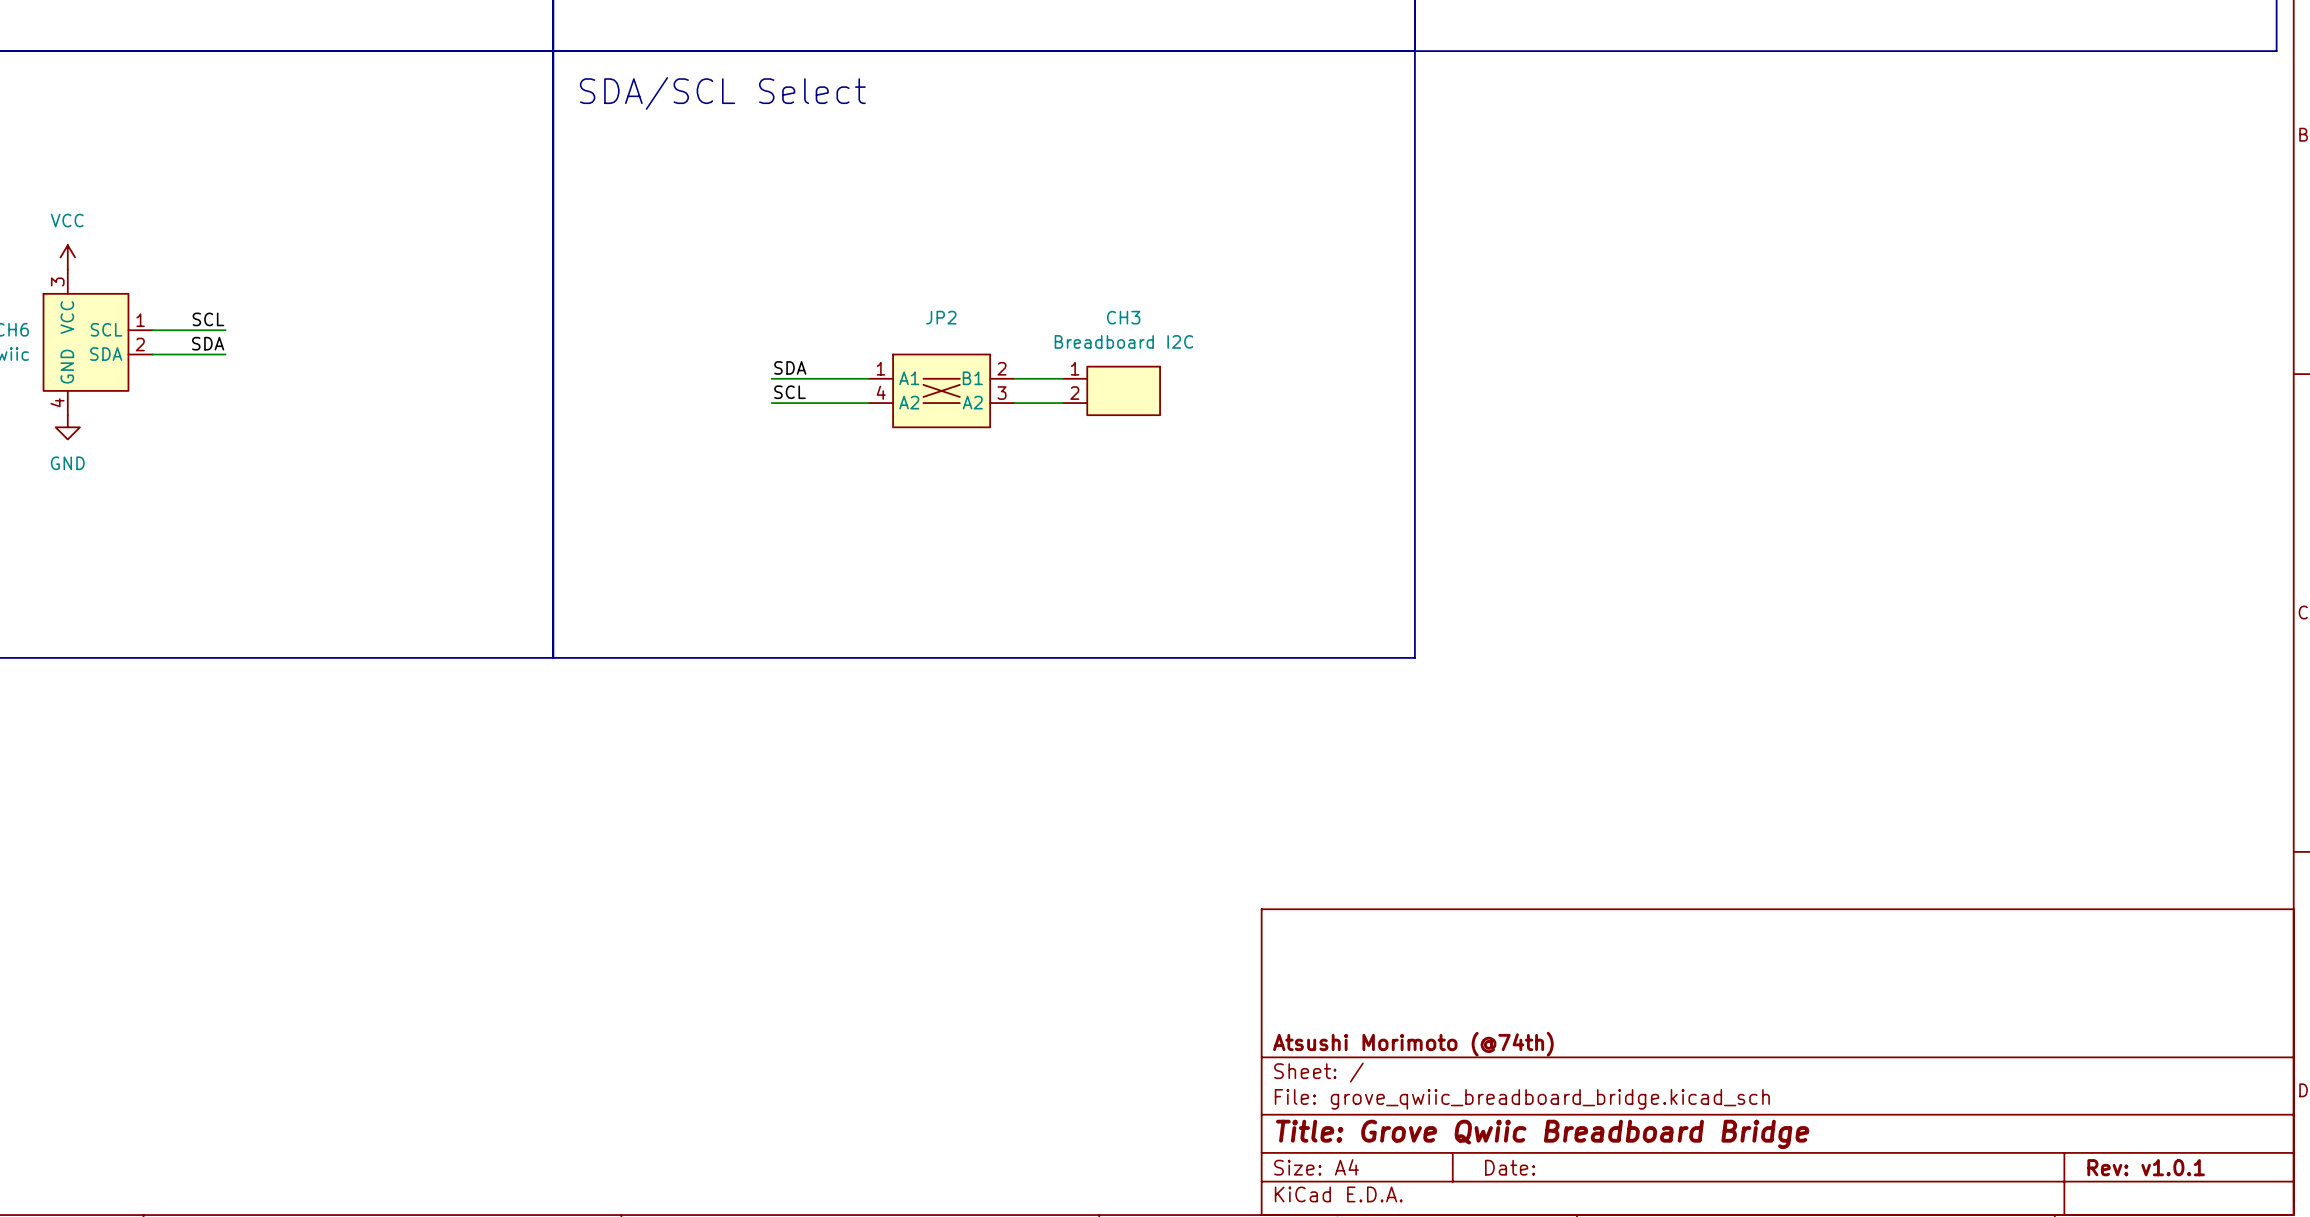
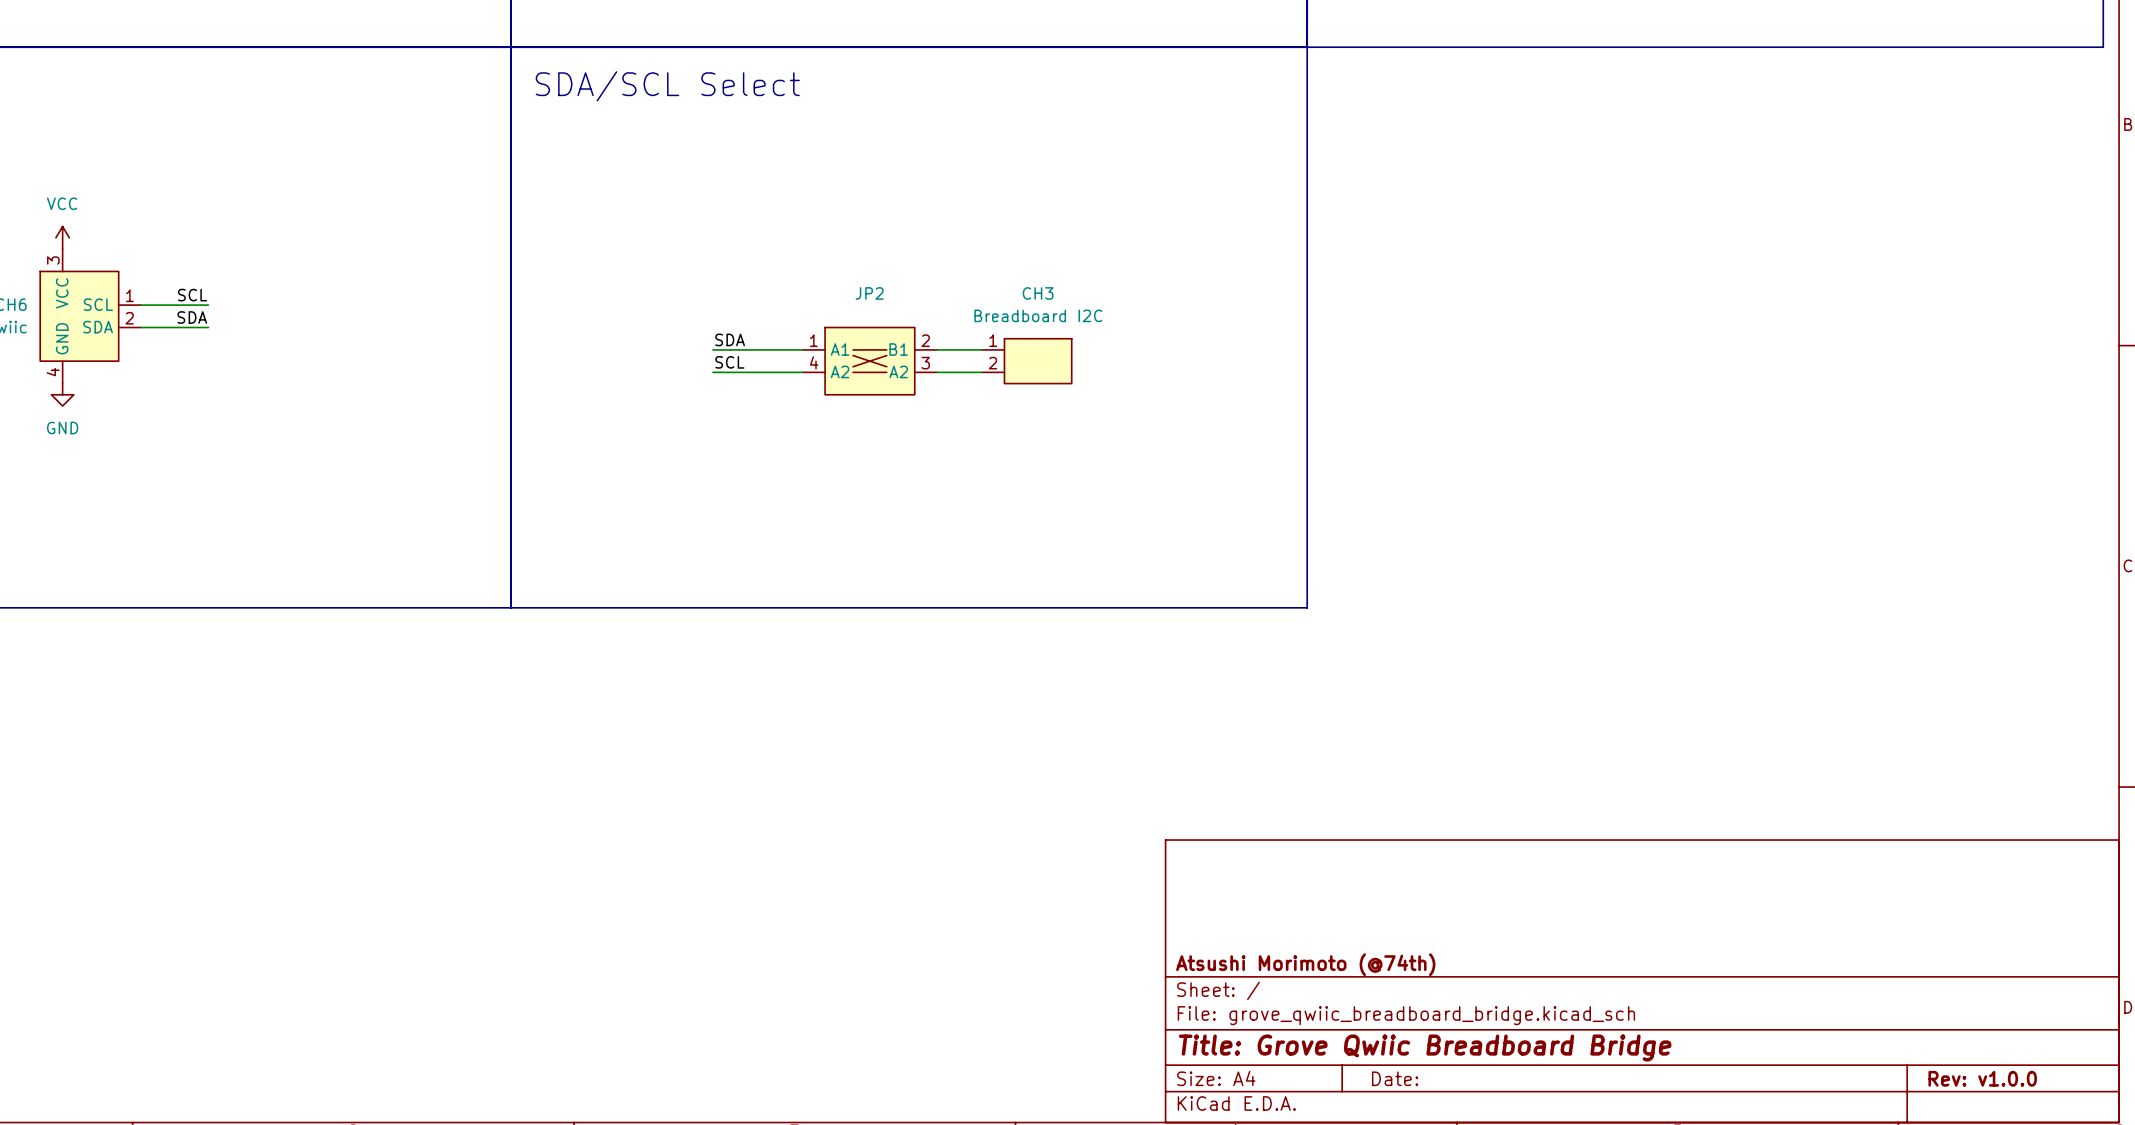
title block: Rev: v1.0.1 (2146, 1167) -> Rev: v1.0.0 (1982, 1078)

